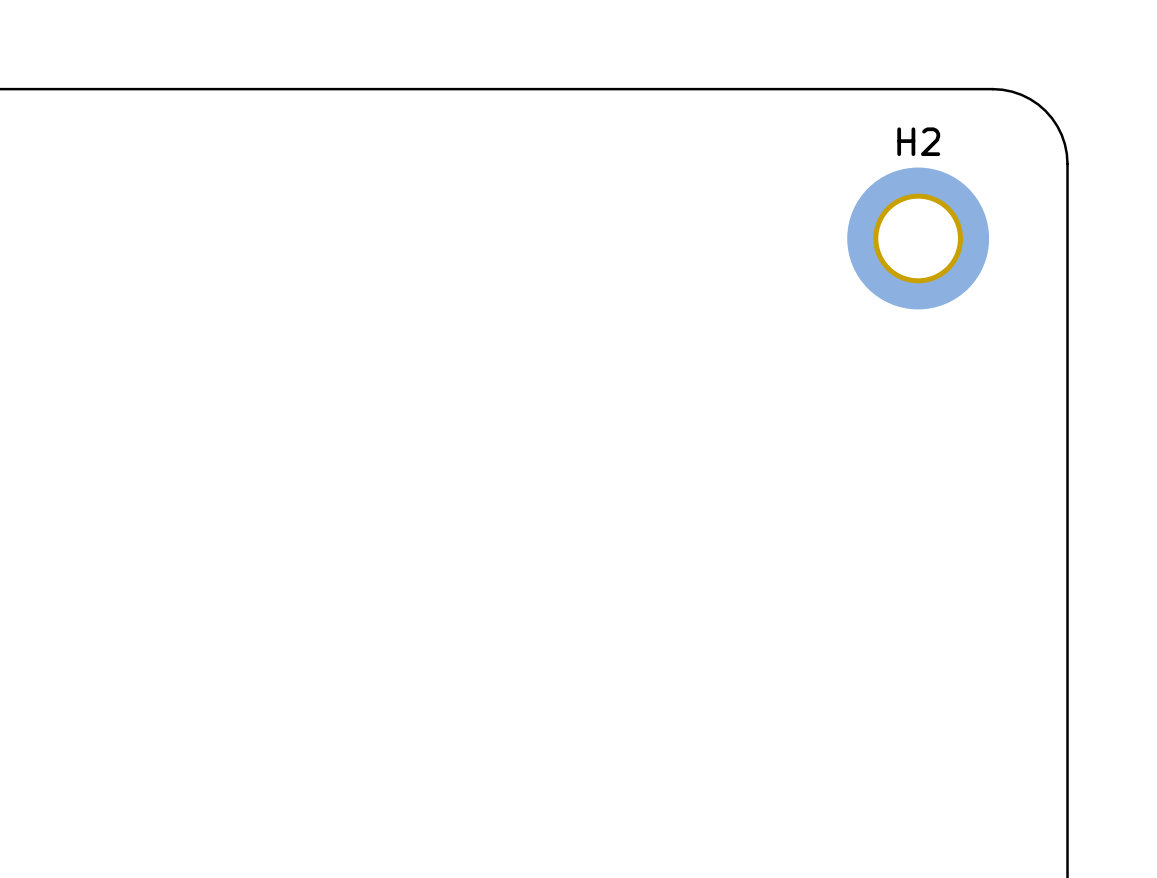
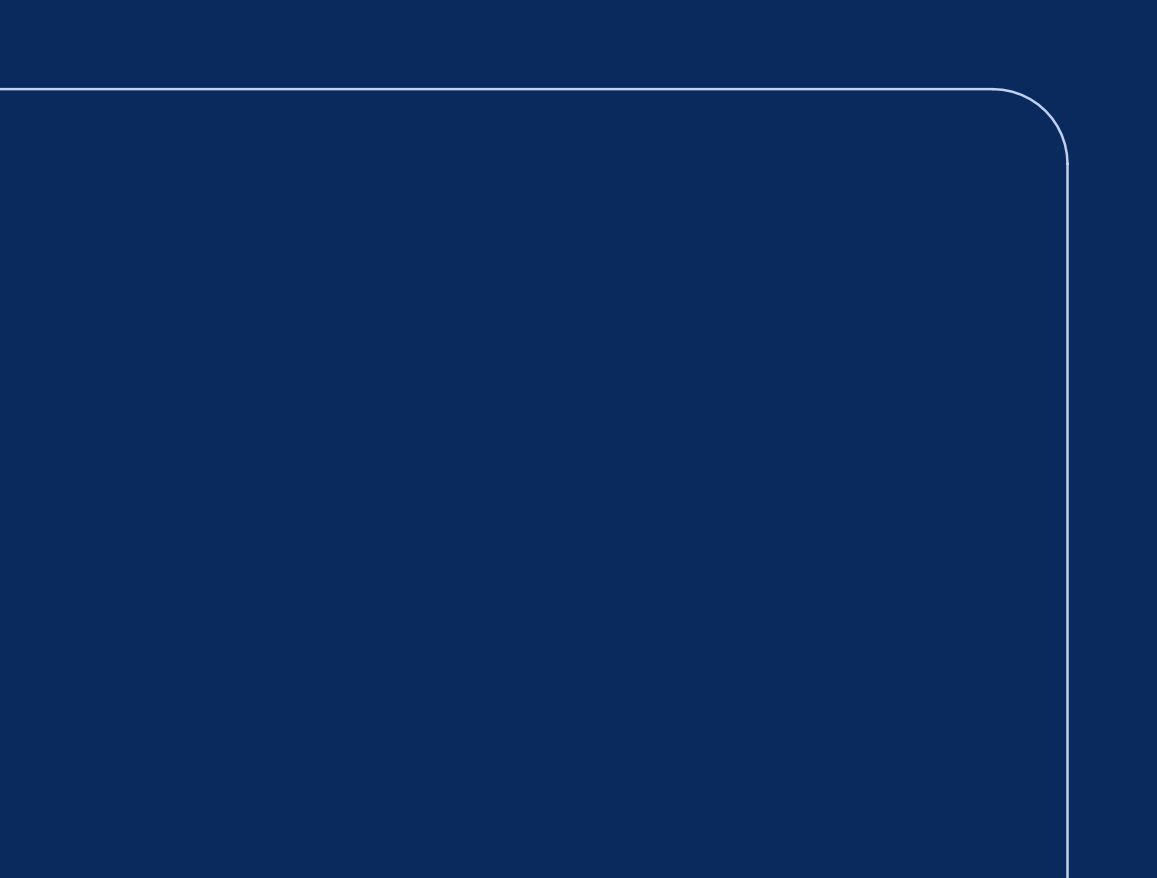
H2: (918, 238) -> none

